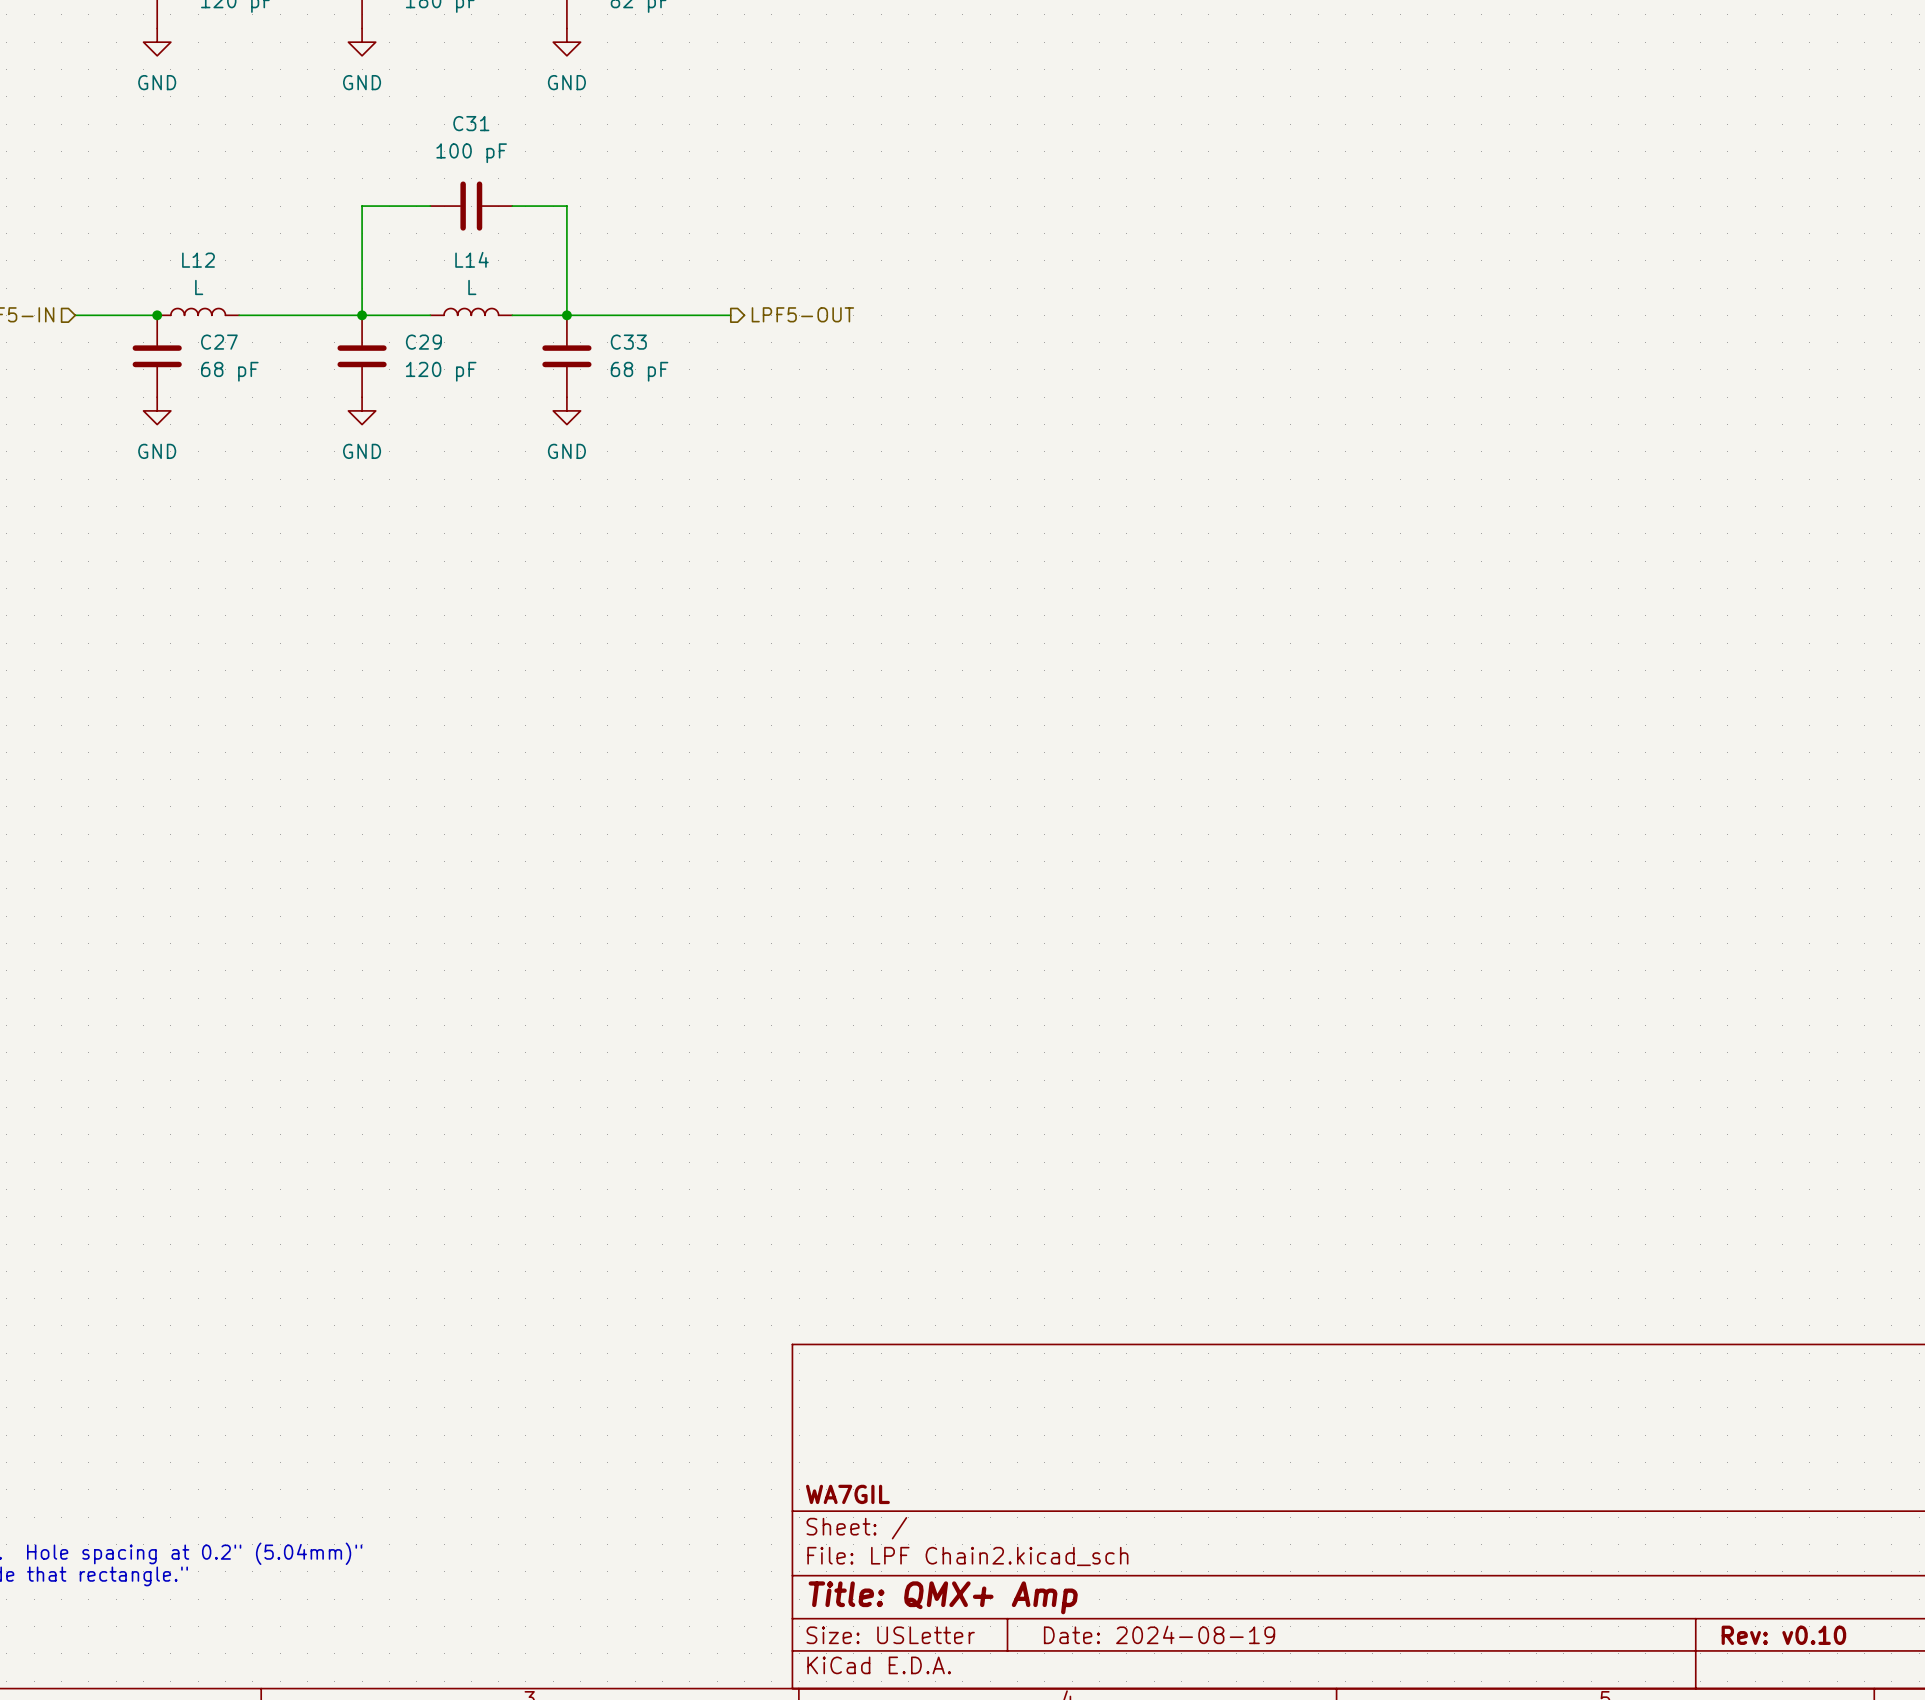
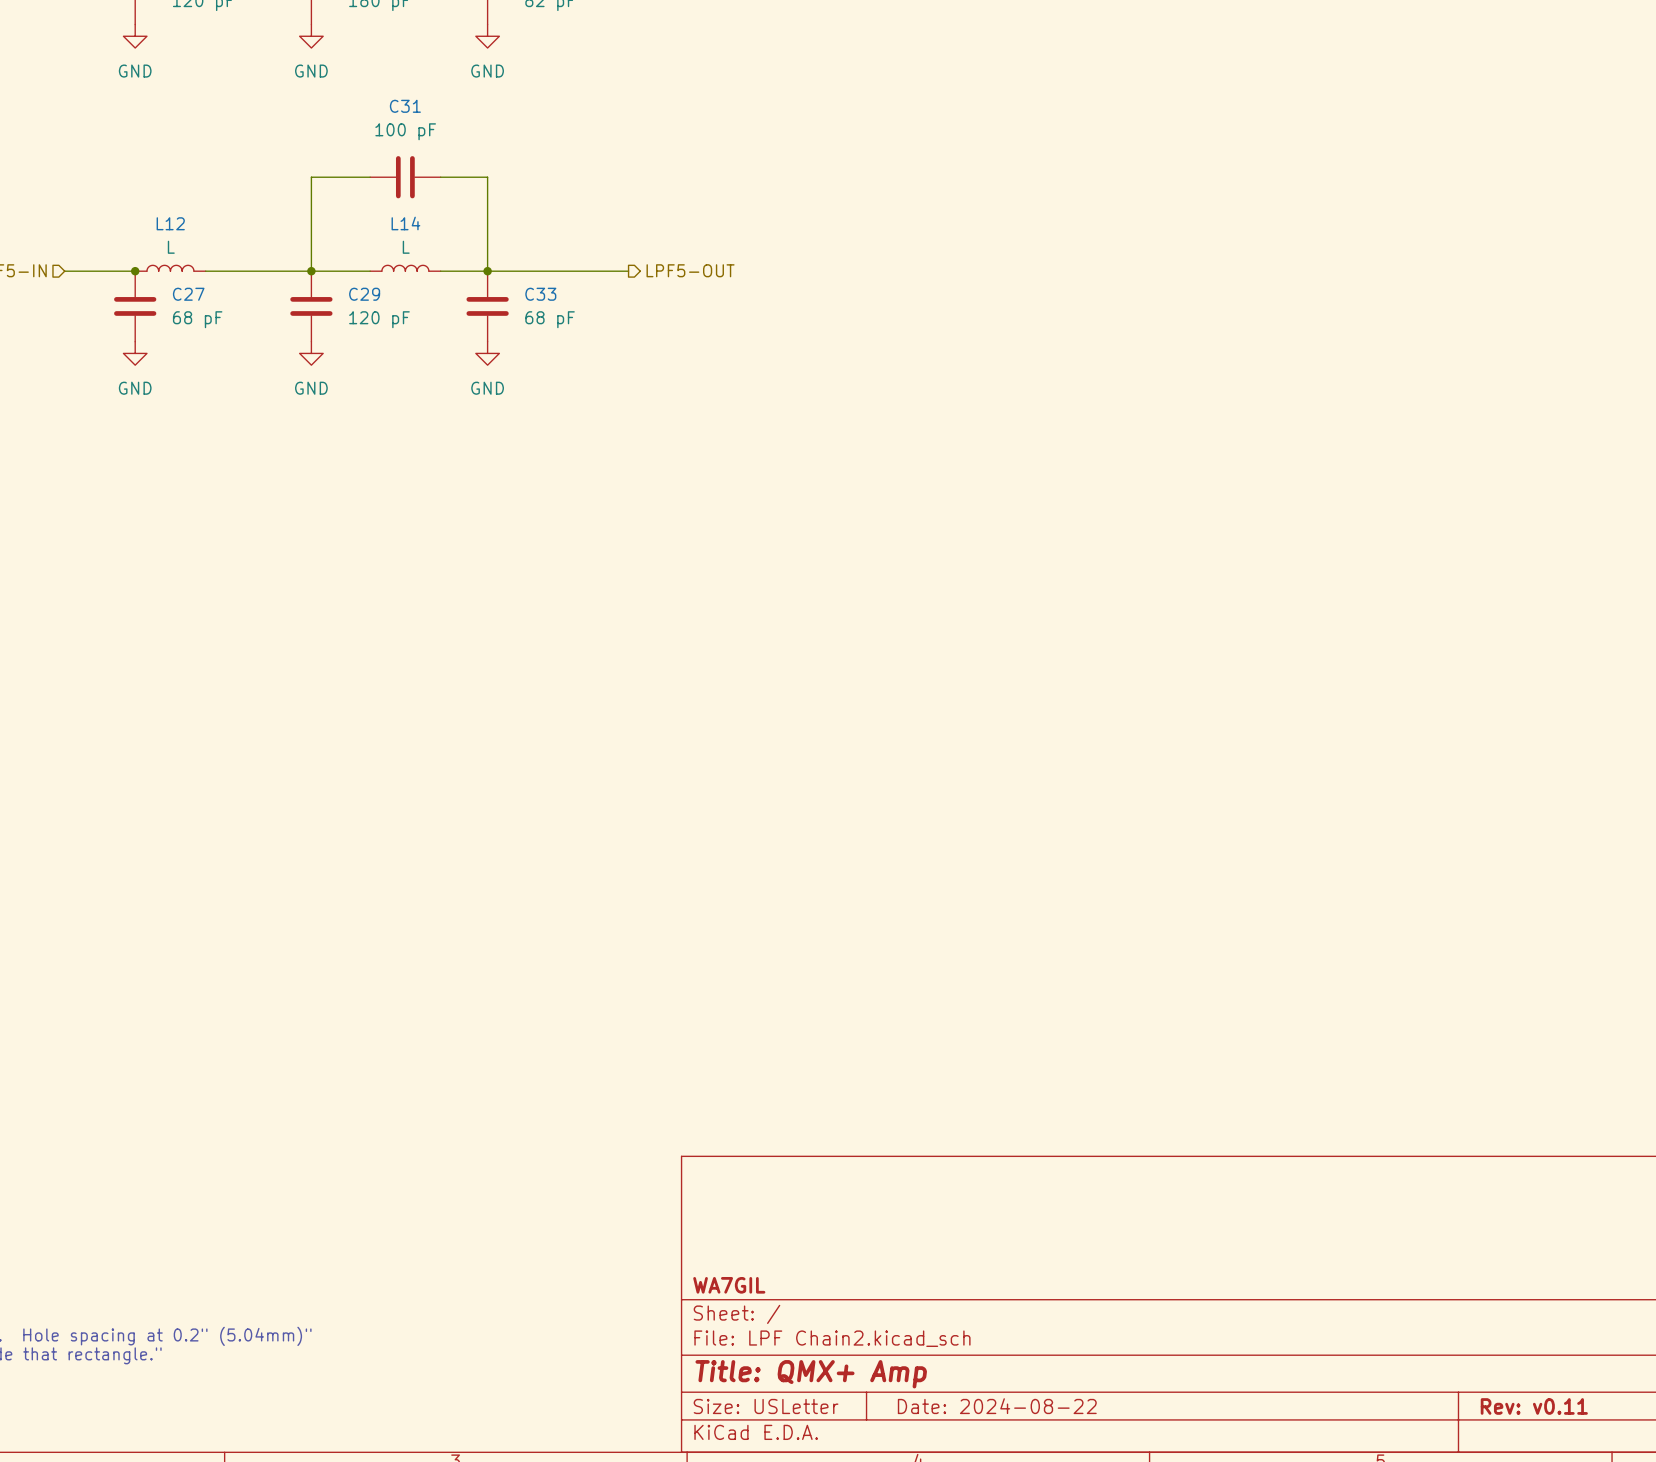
title block: Date: 2024-08-19 (1159, 1634) -> Date: 2024-08-22 (997, 1406)
title block: Rev: v0.10 (1783, 1635) -> Rev: v0.11 (1534, 1406)

